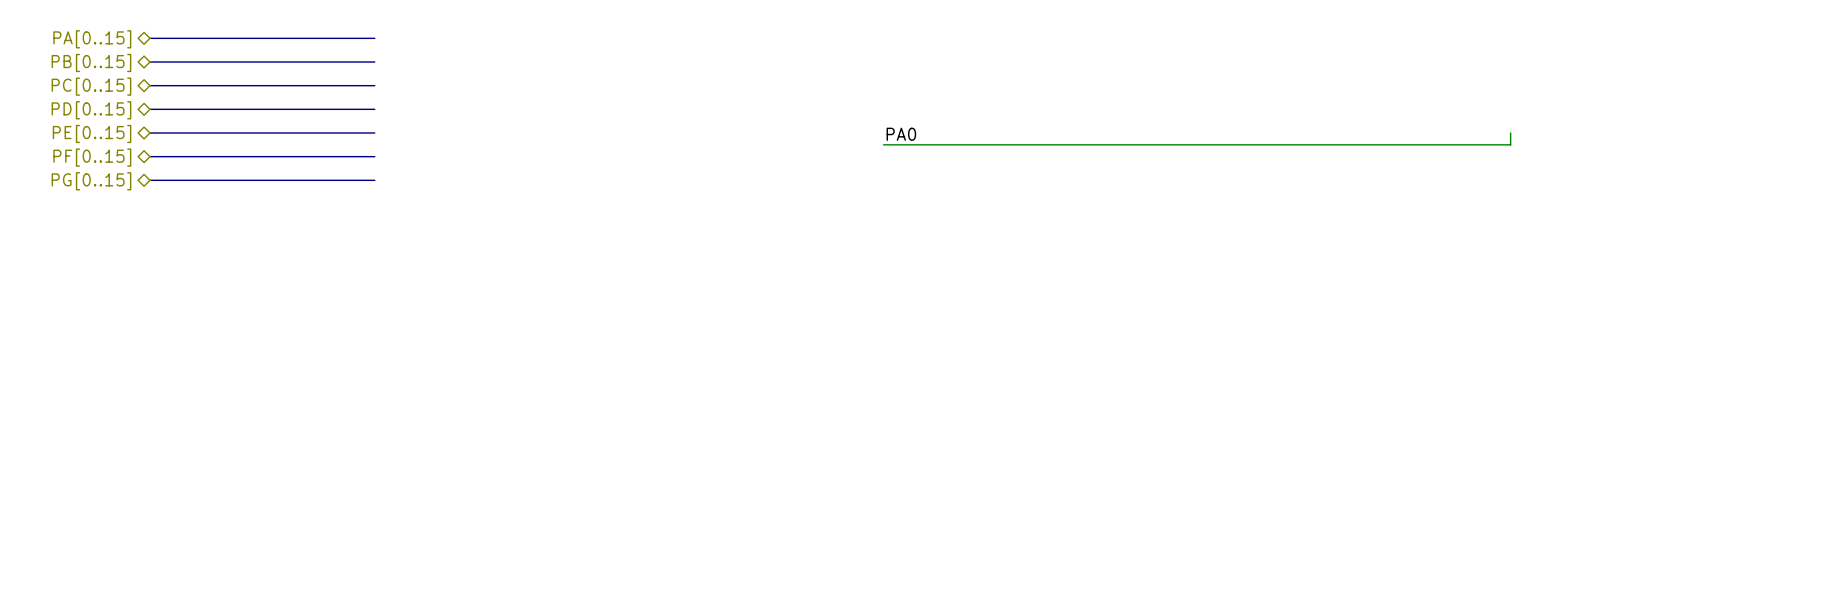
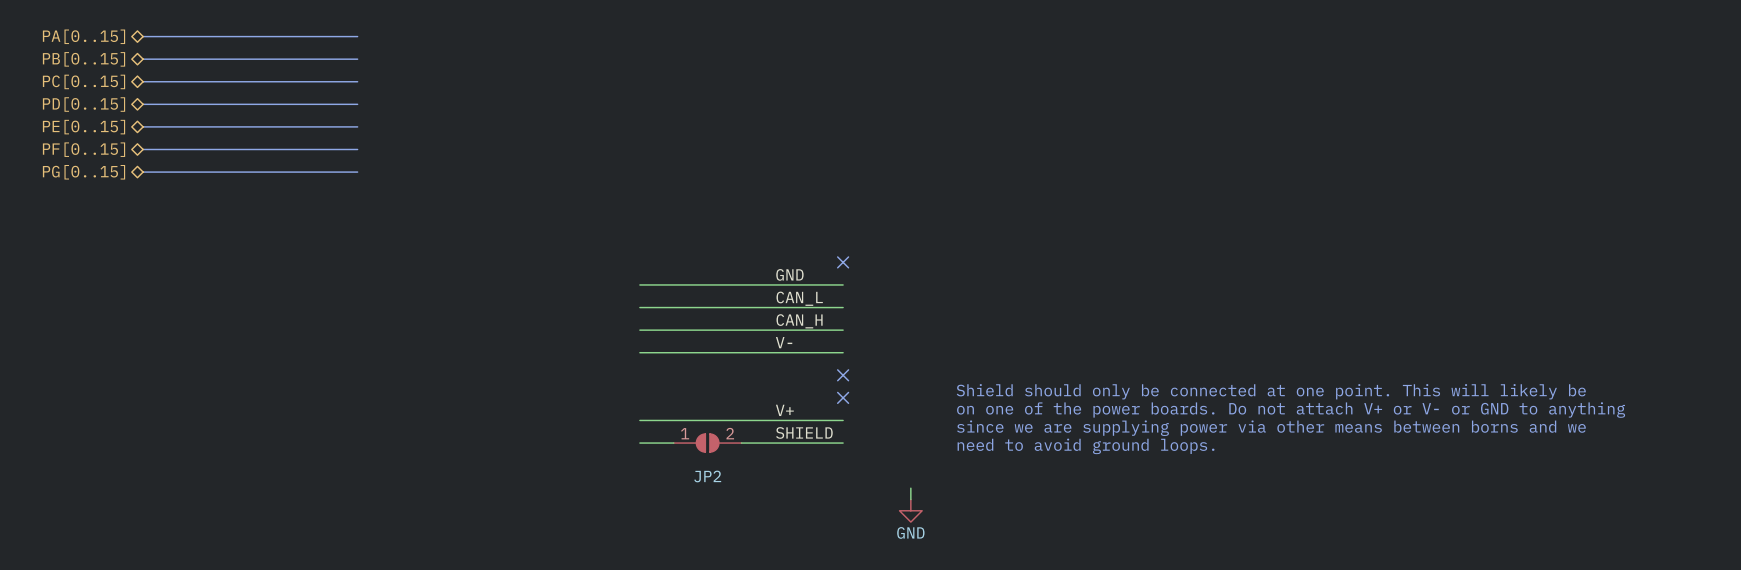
wire: (1510, 133) (1510, 144) (883, 144) -> none
label: PA0 (901, 134) -> none
no-connect mark: none -> (843, 262)
label: none -> GND (789, 274)
wire: none -> (639, 284) (843, 284)
label: none -> CAN_L (799, 298)
wire: none -> (639, 307) (843, 307)
label: none -> CAN_H (799, 321)
wire: none -> (639, 330) (843, 330)
label: none -> V- (784, 342)
wire: none -> (639, 352) (843, 352)
no-connect mark: none -> (843, 375)
text: none -> Shield should only be connected at one point. This will likely be (1271, 391)
no-connect mark: none -> (843, 397)
label: none -> V+ (784, 410)
text: none -> on one of the power boards. Do not attach V+ or V- or GND to anything (1291, 410)
wire: none -> (639, 420) (843, 420)
text: none -> since we are supplying power via other means between borns and we (1271, 428)
label: none -> SHIELD (804, 432)
wire: none -> (639, 443) (673, 443)
JP2: none -> (707, 443)
wire: none -> (741, 443) (843, 443)
text: none -> need to avoid ground loops. (1086, 446)
wire: none -> (910, 488) (910, 499)
power symbol: none -> GND (910, 510)

